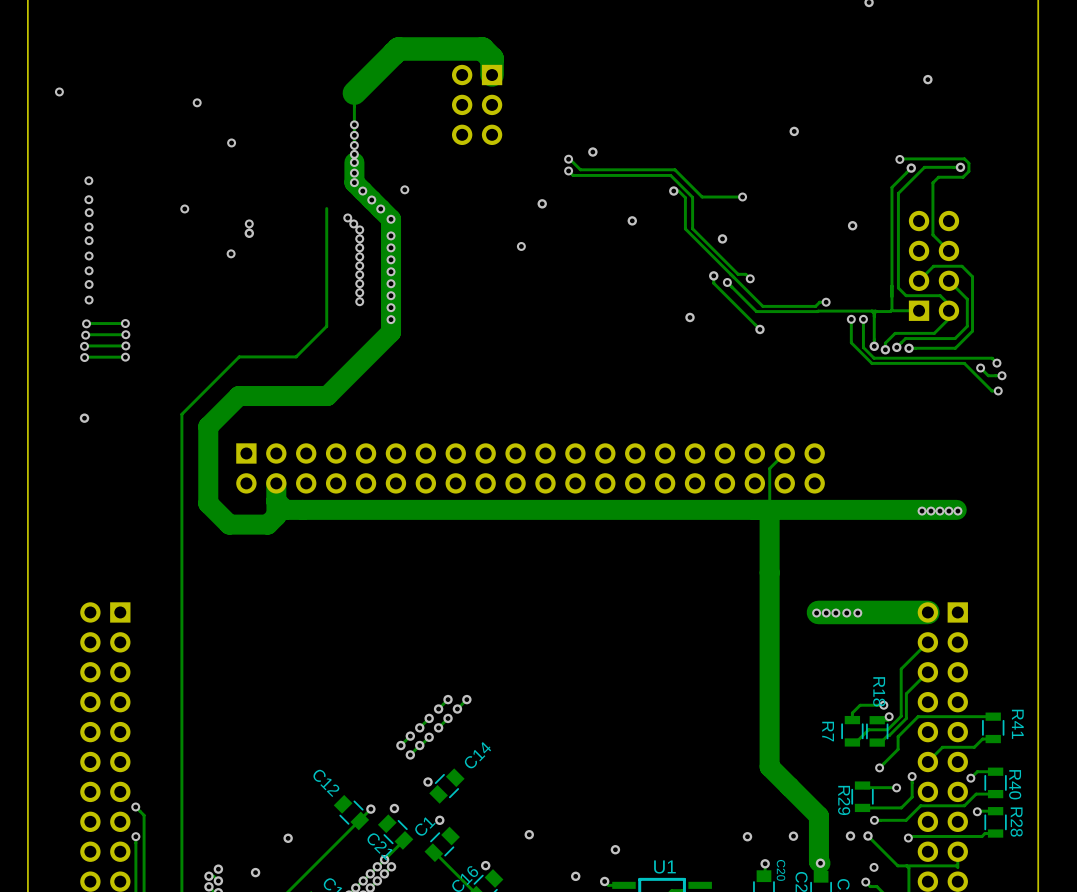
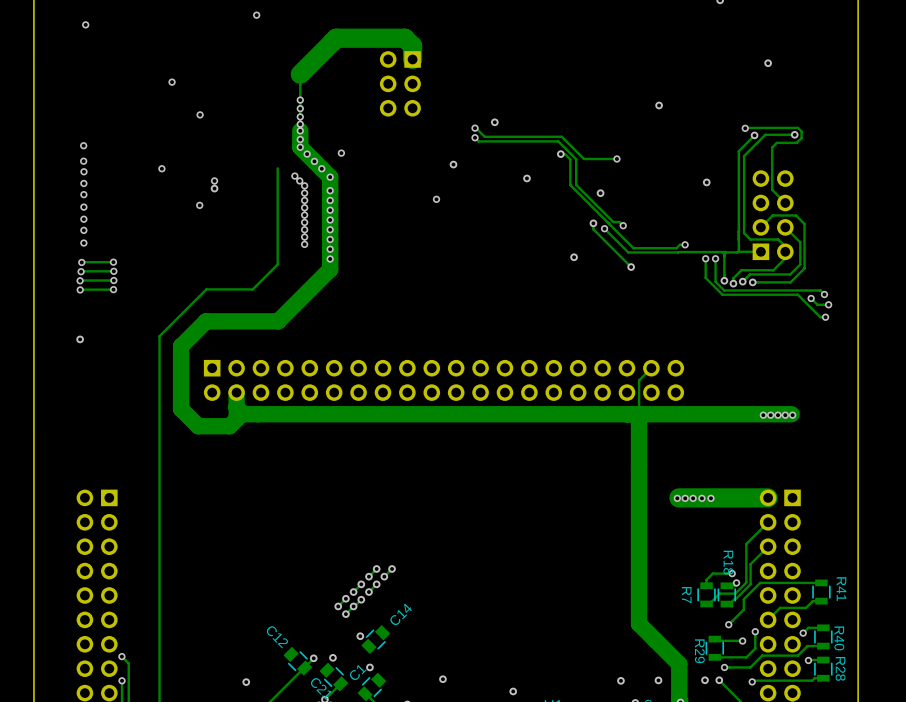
via: none -> (256, 15)
via position: (59, 91) -> (85, 24)

